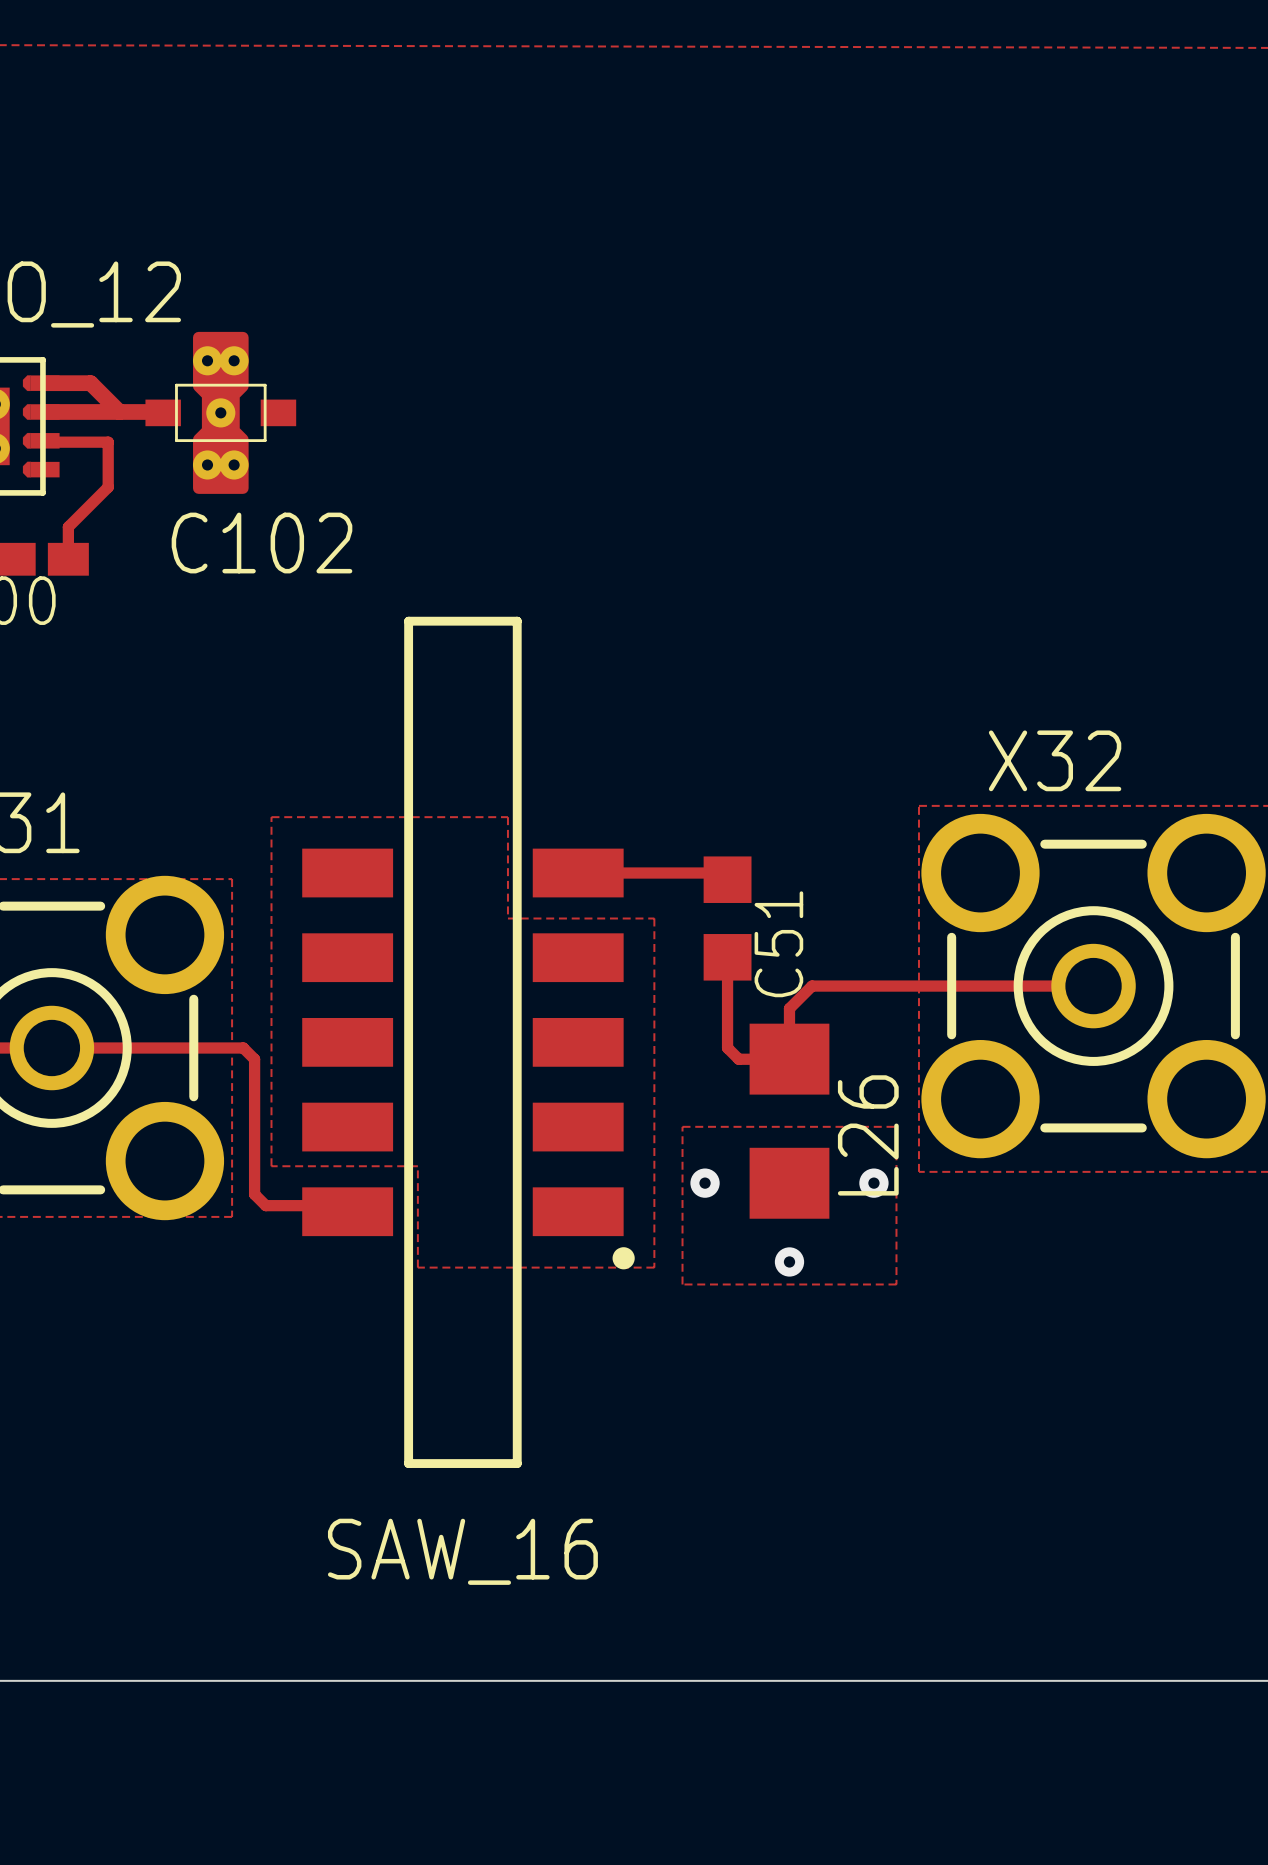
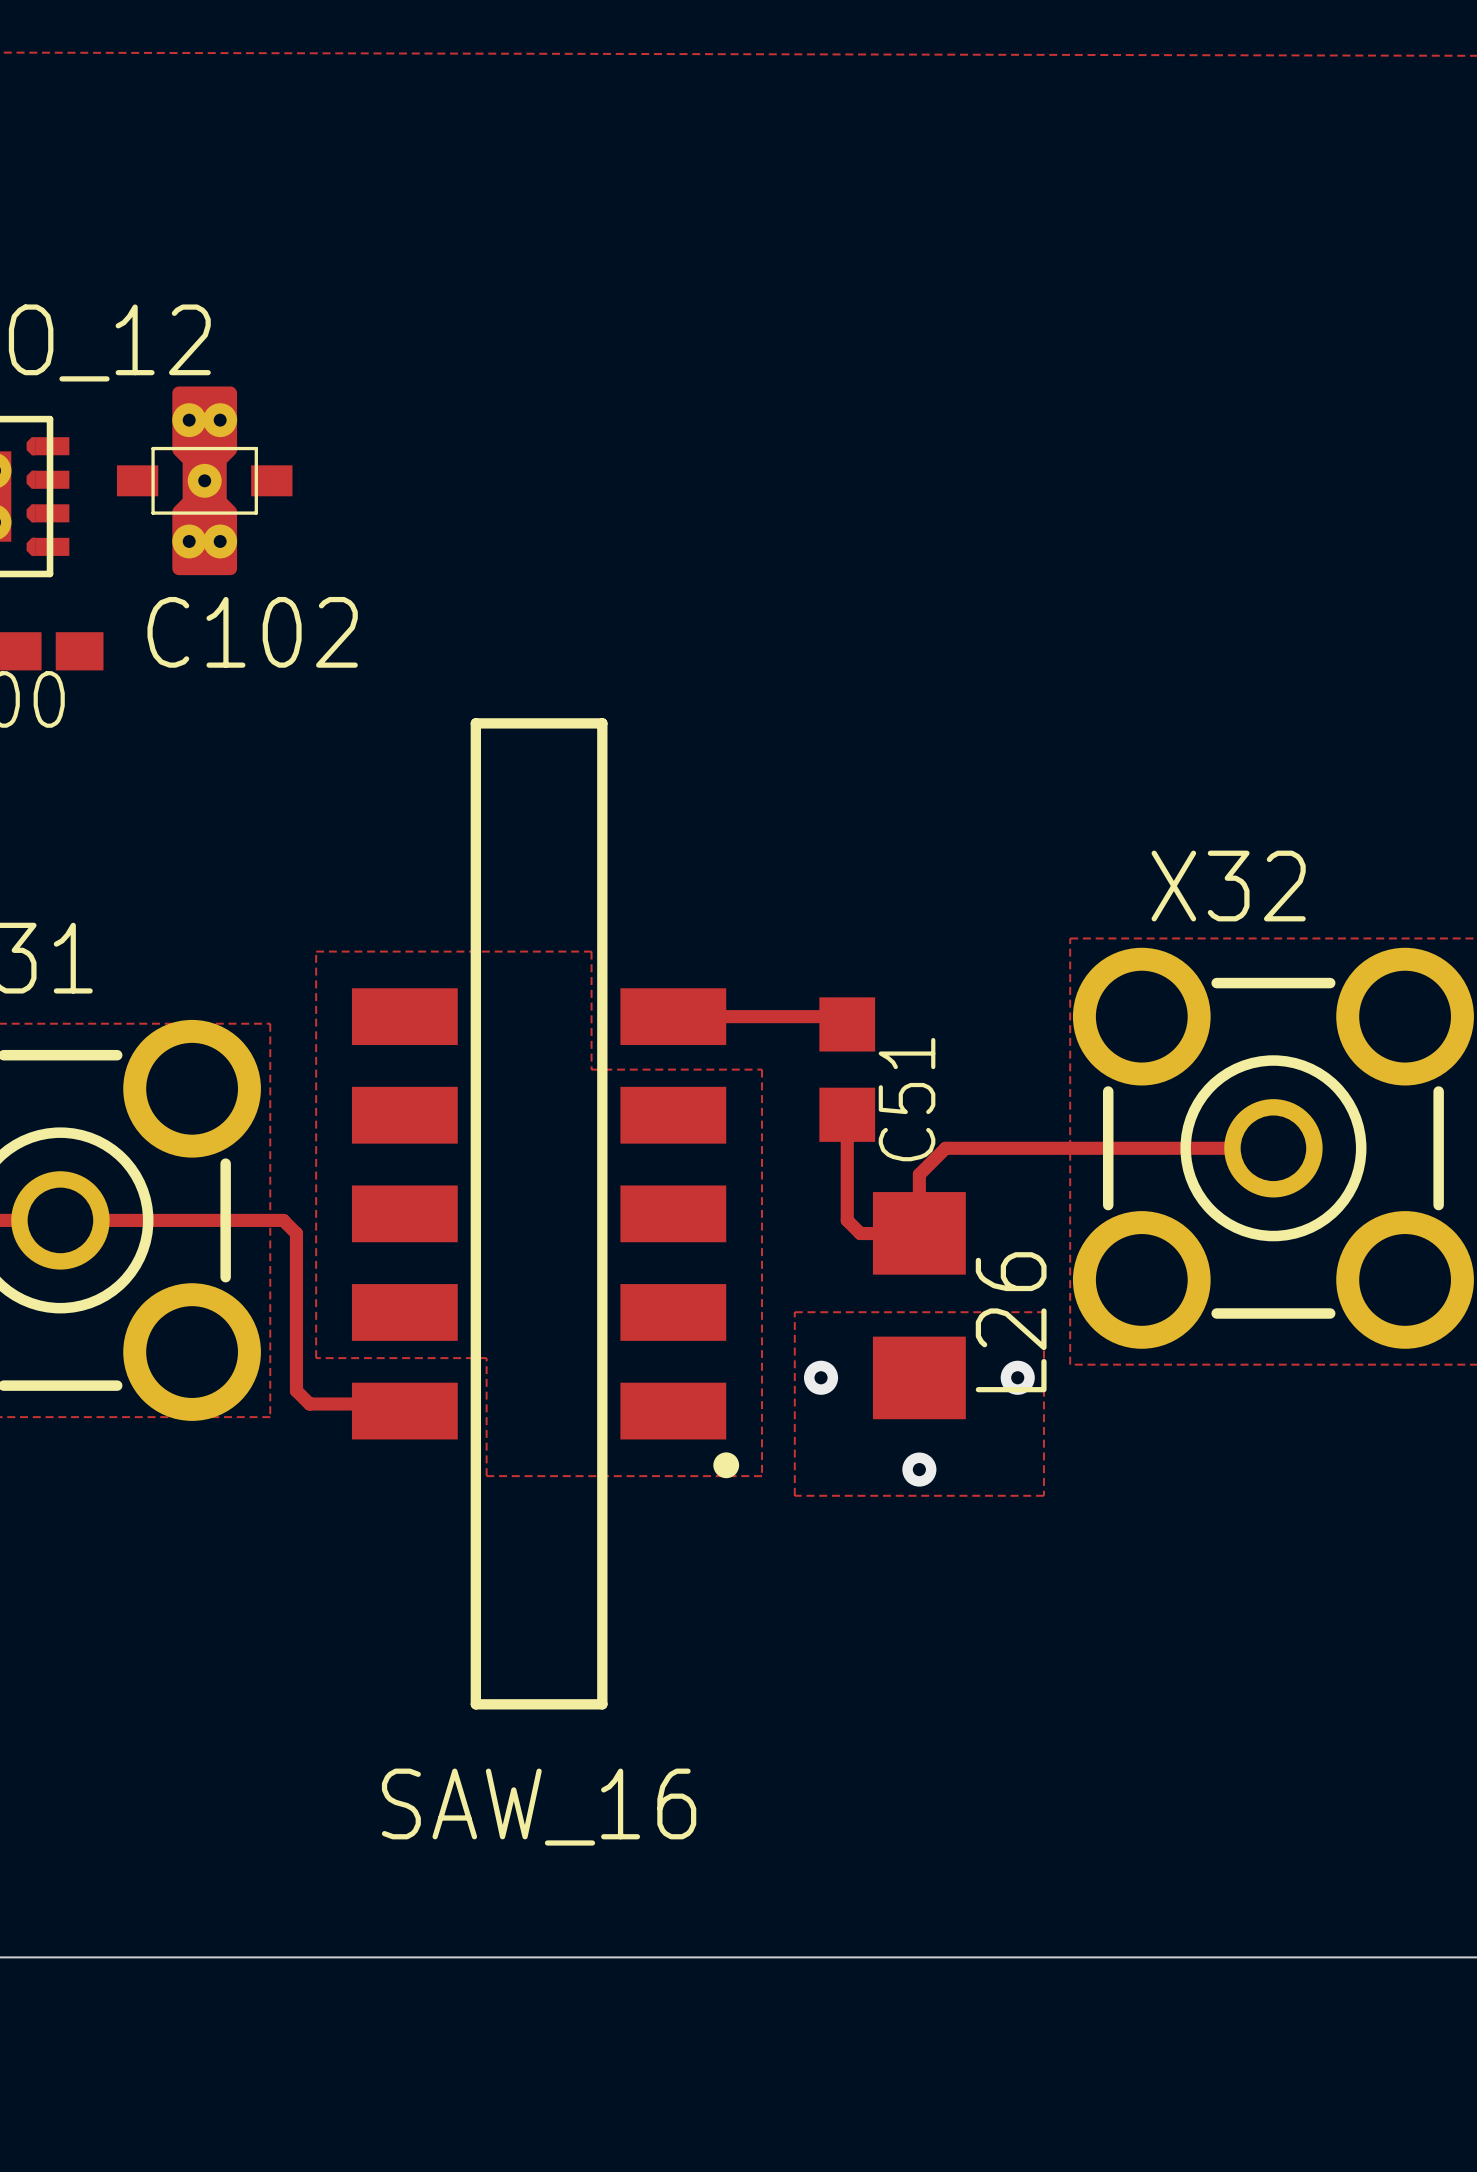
track: (45, 383) (90, 383) (119, 411) -> none
track: (45, 411) (163, 412) -> none
C102 position: (220, 412) -> (204, 480)
track: (45, 440) (108, 442) (108, 487) (68, 527) (68, 559) -> none

